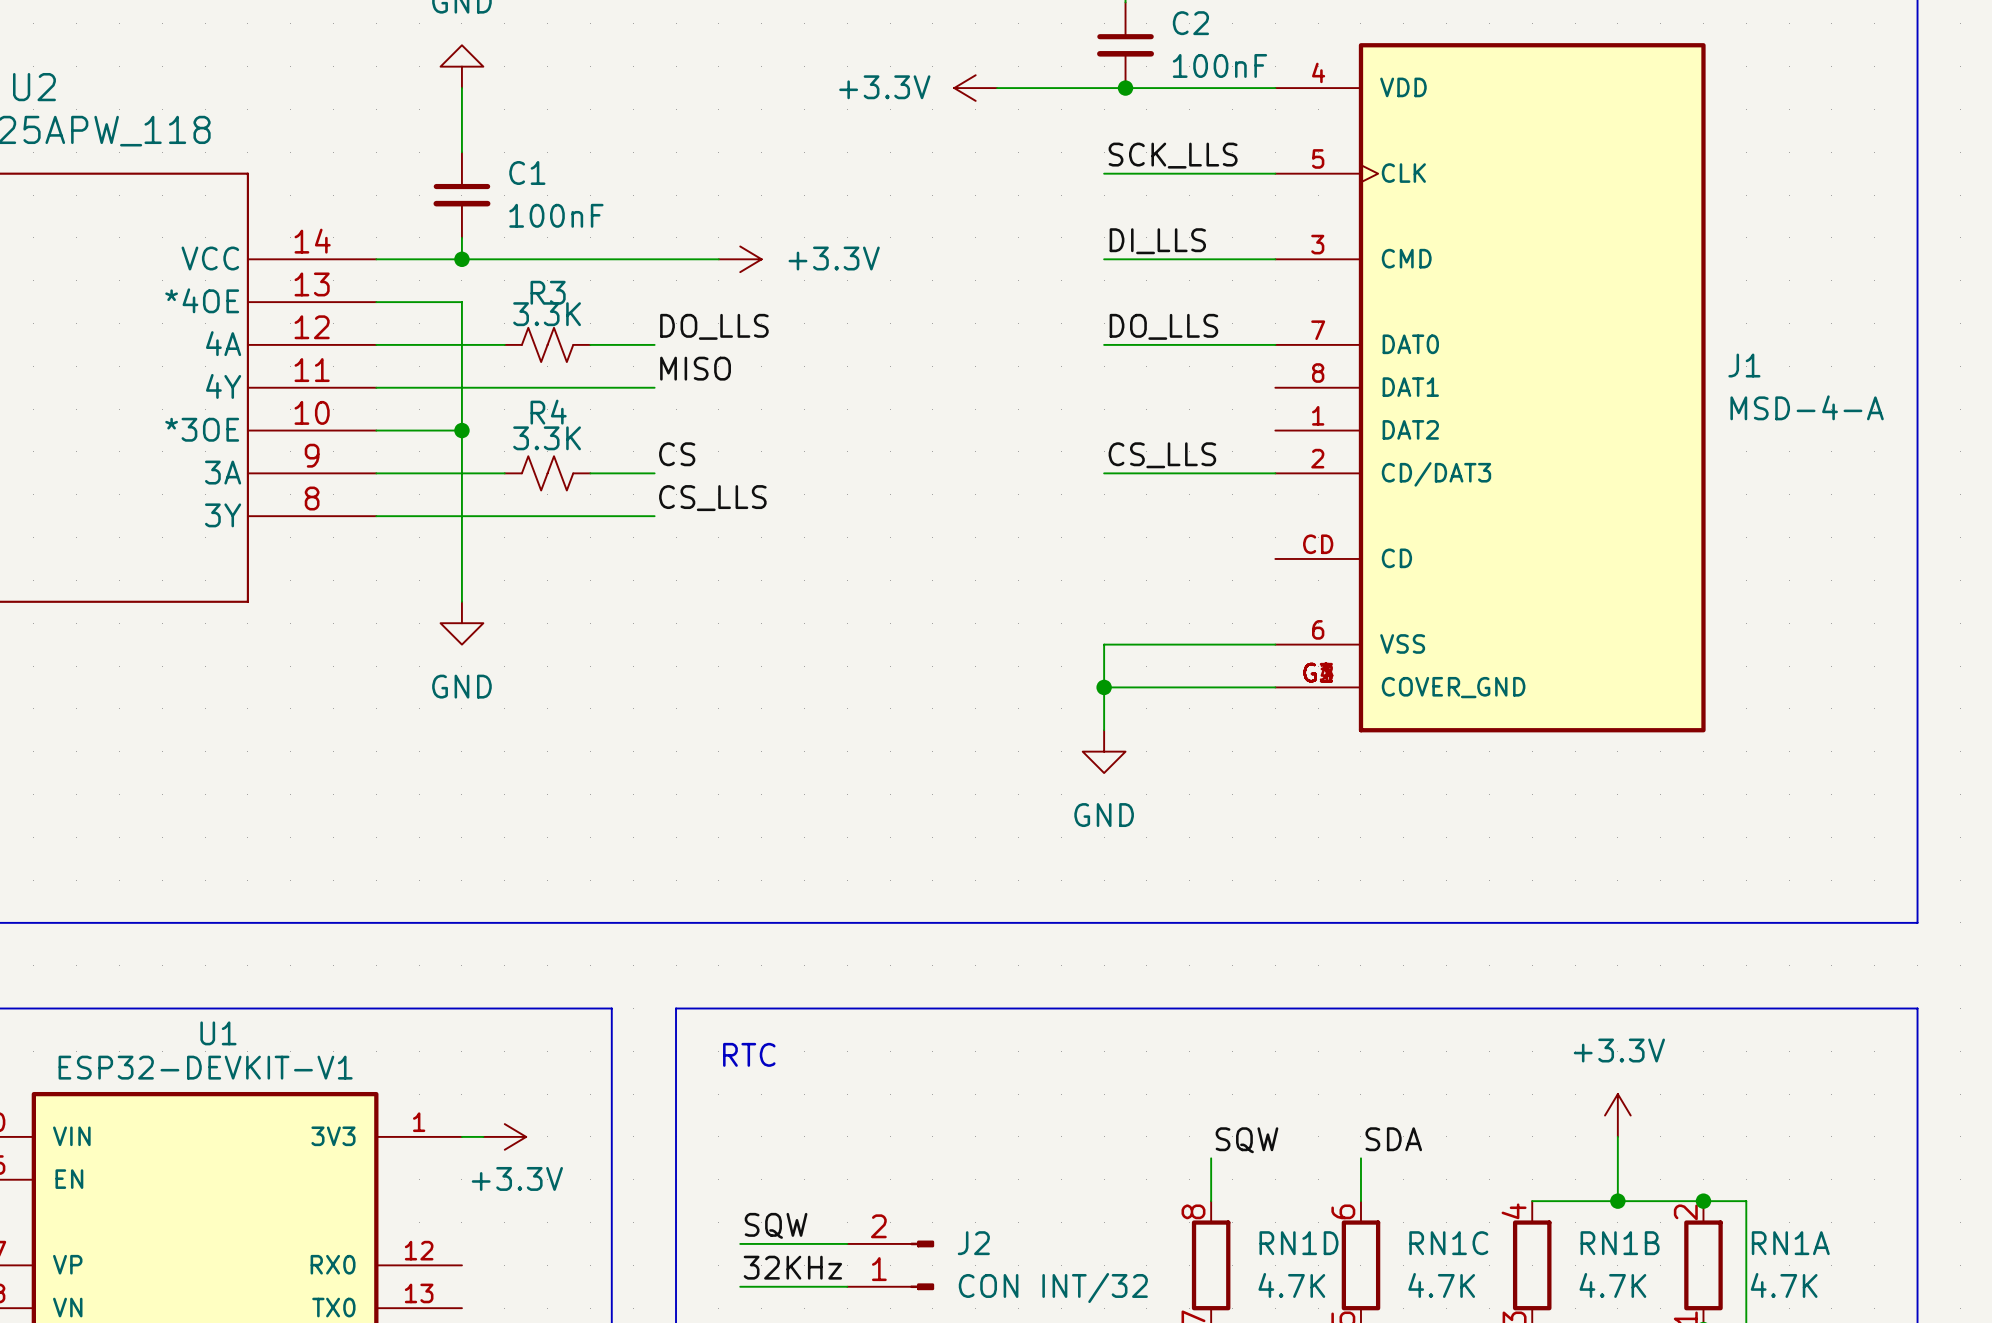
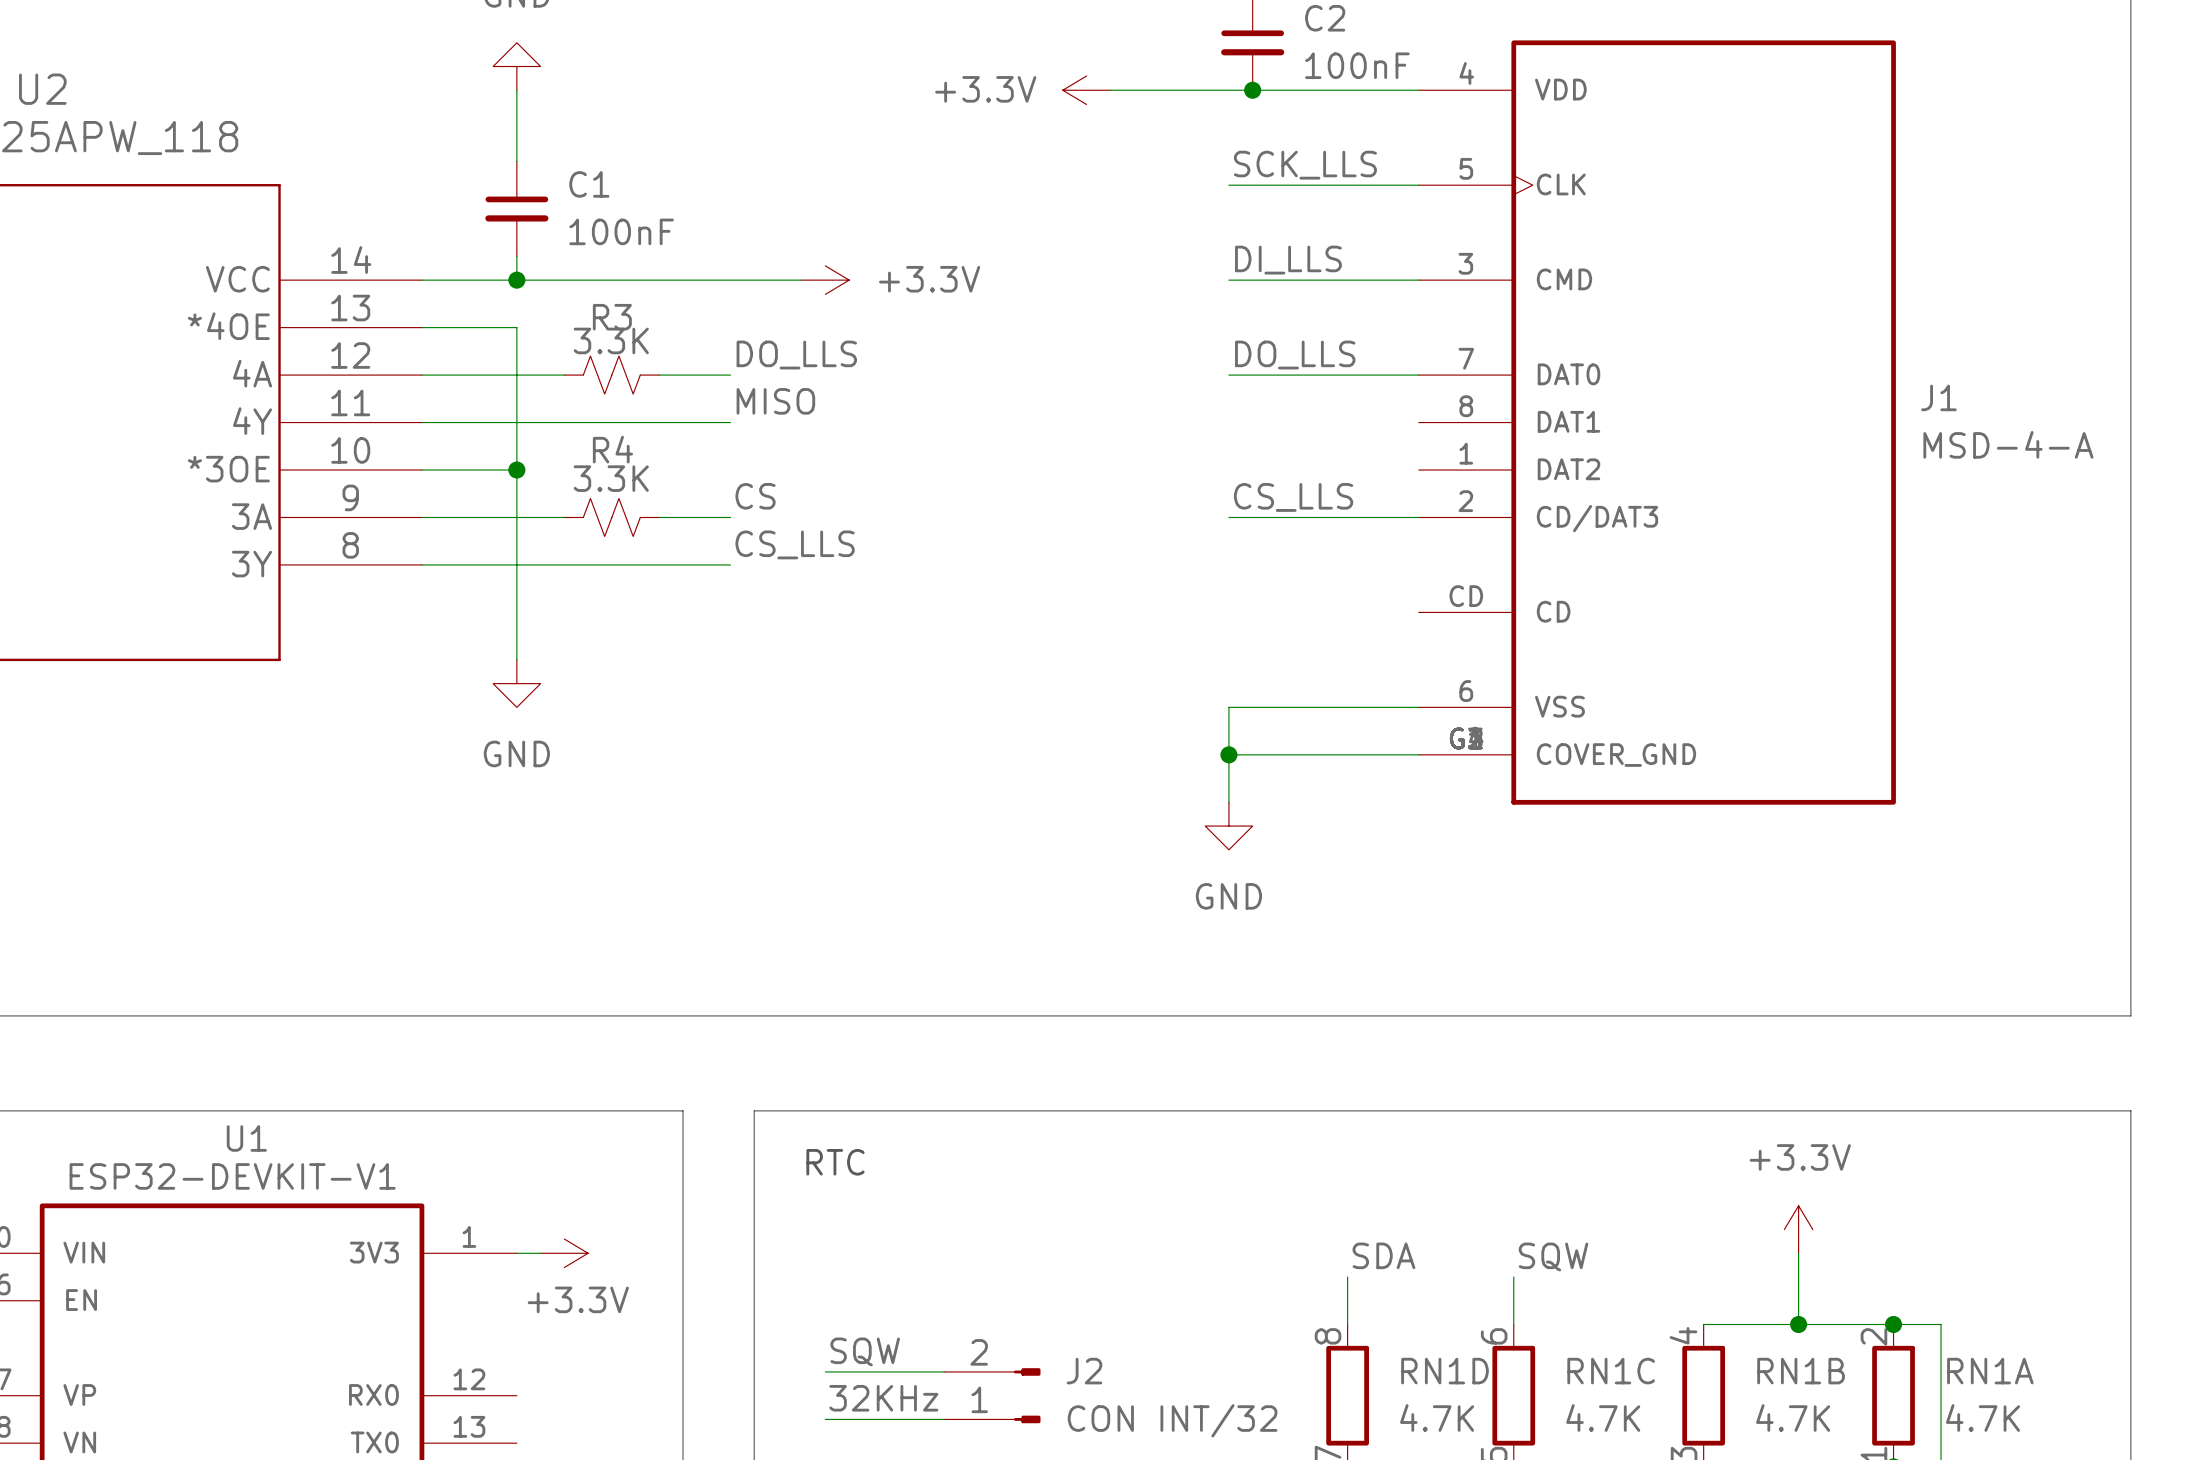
label: SDA (1393, 1139) -> SQW (1553, 1256)
label: SQW (1246, 1140) -> SDA (1383, 1255)

